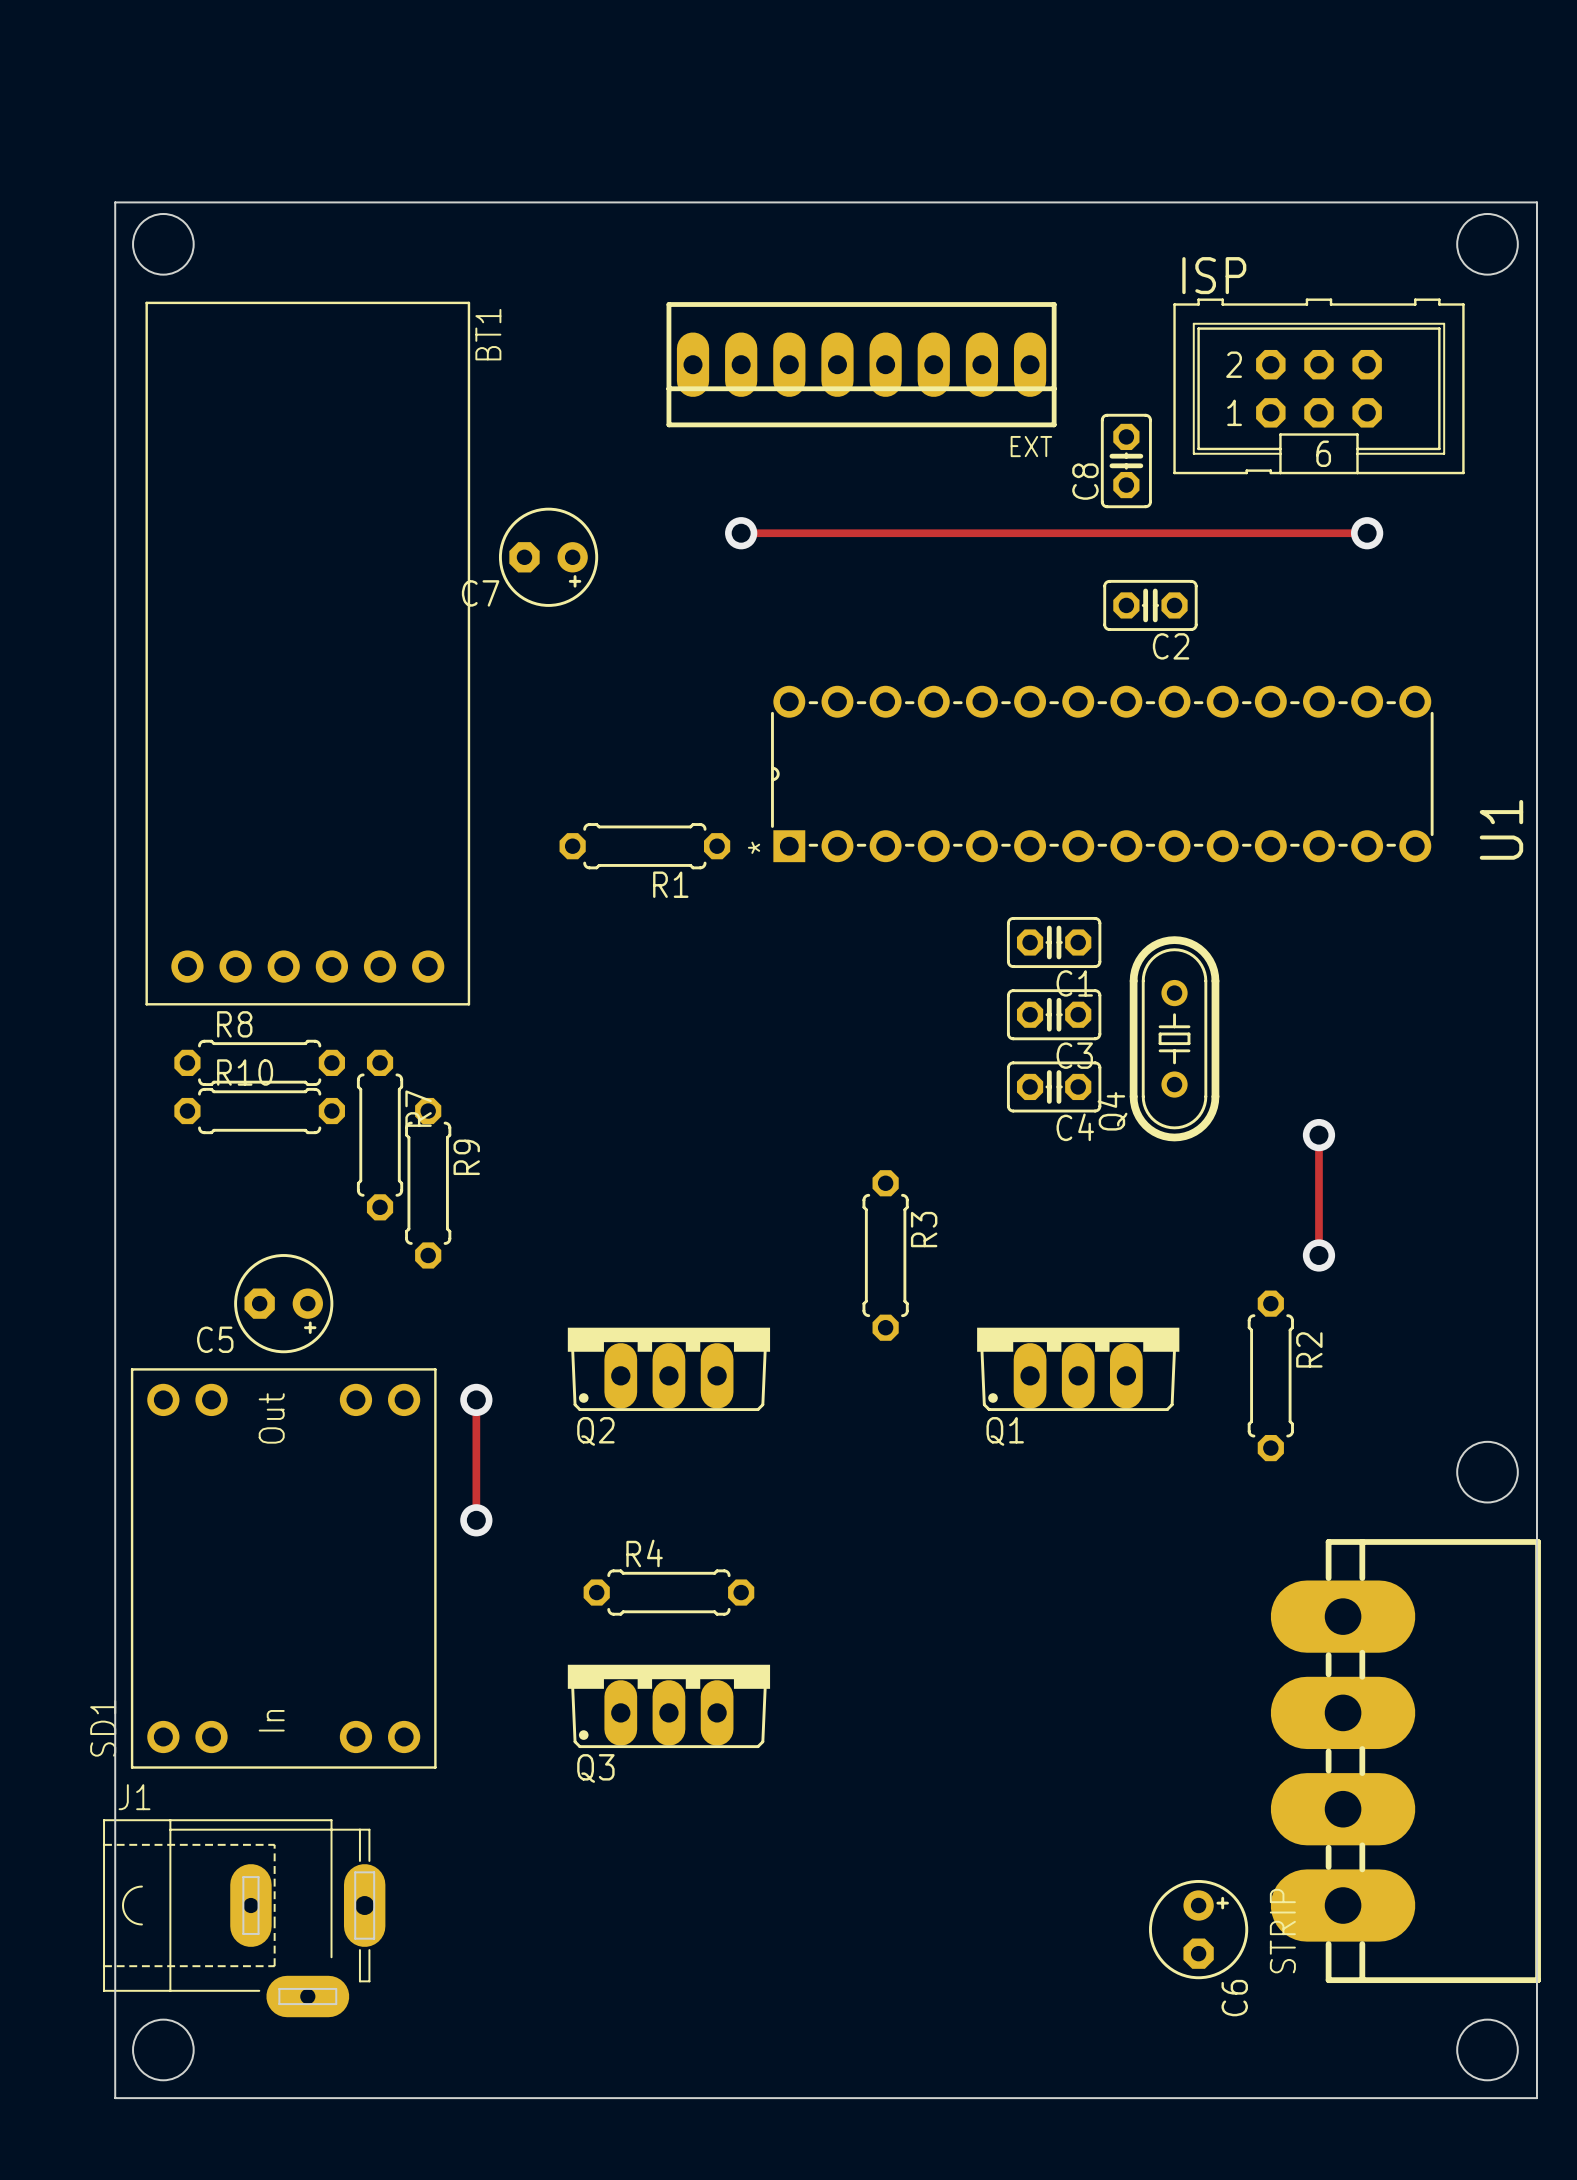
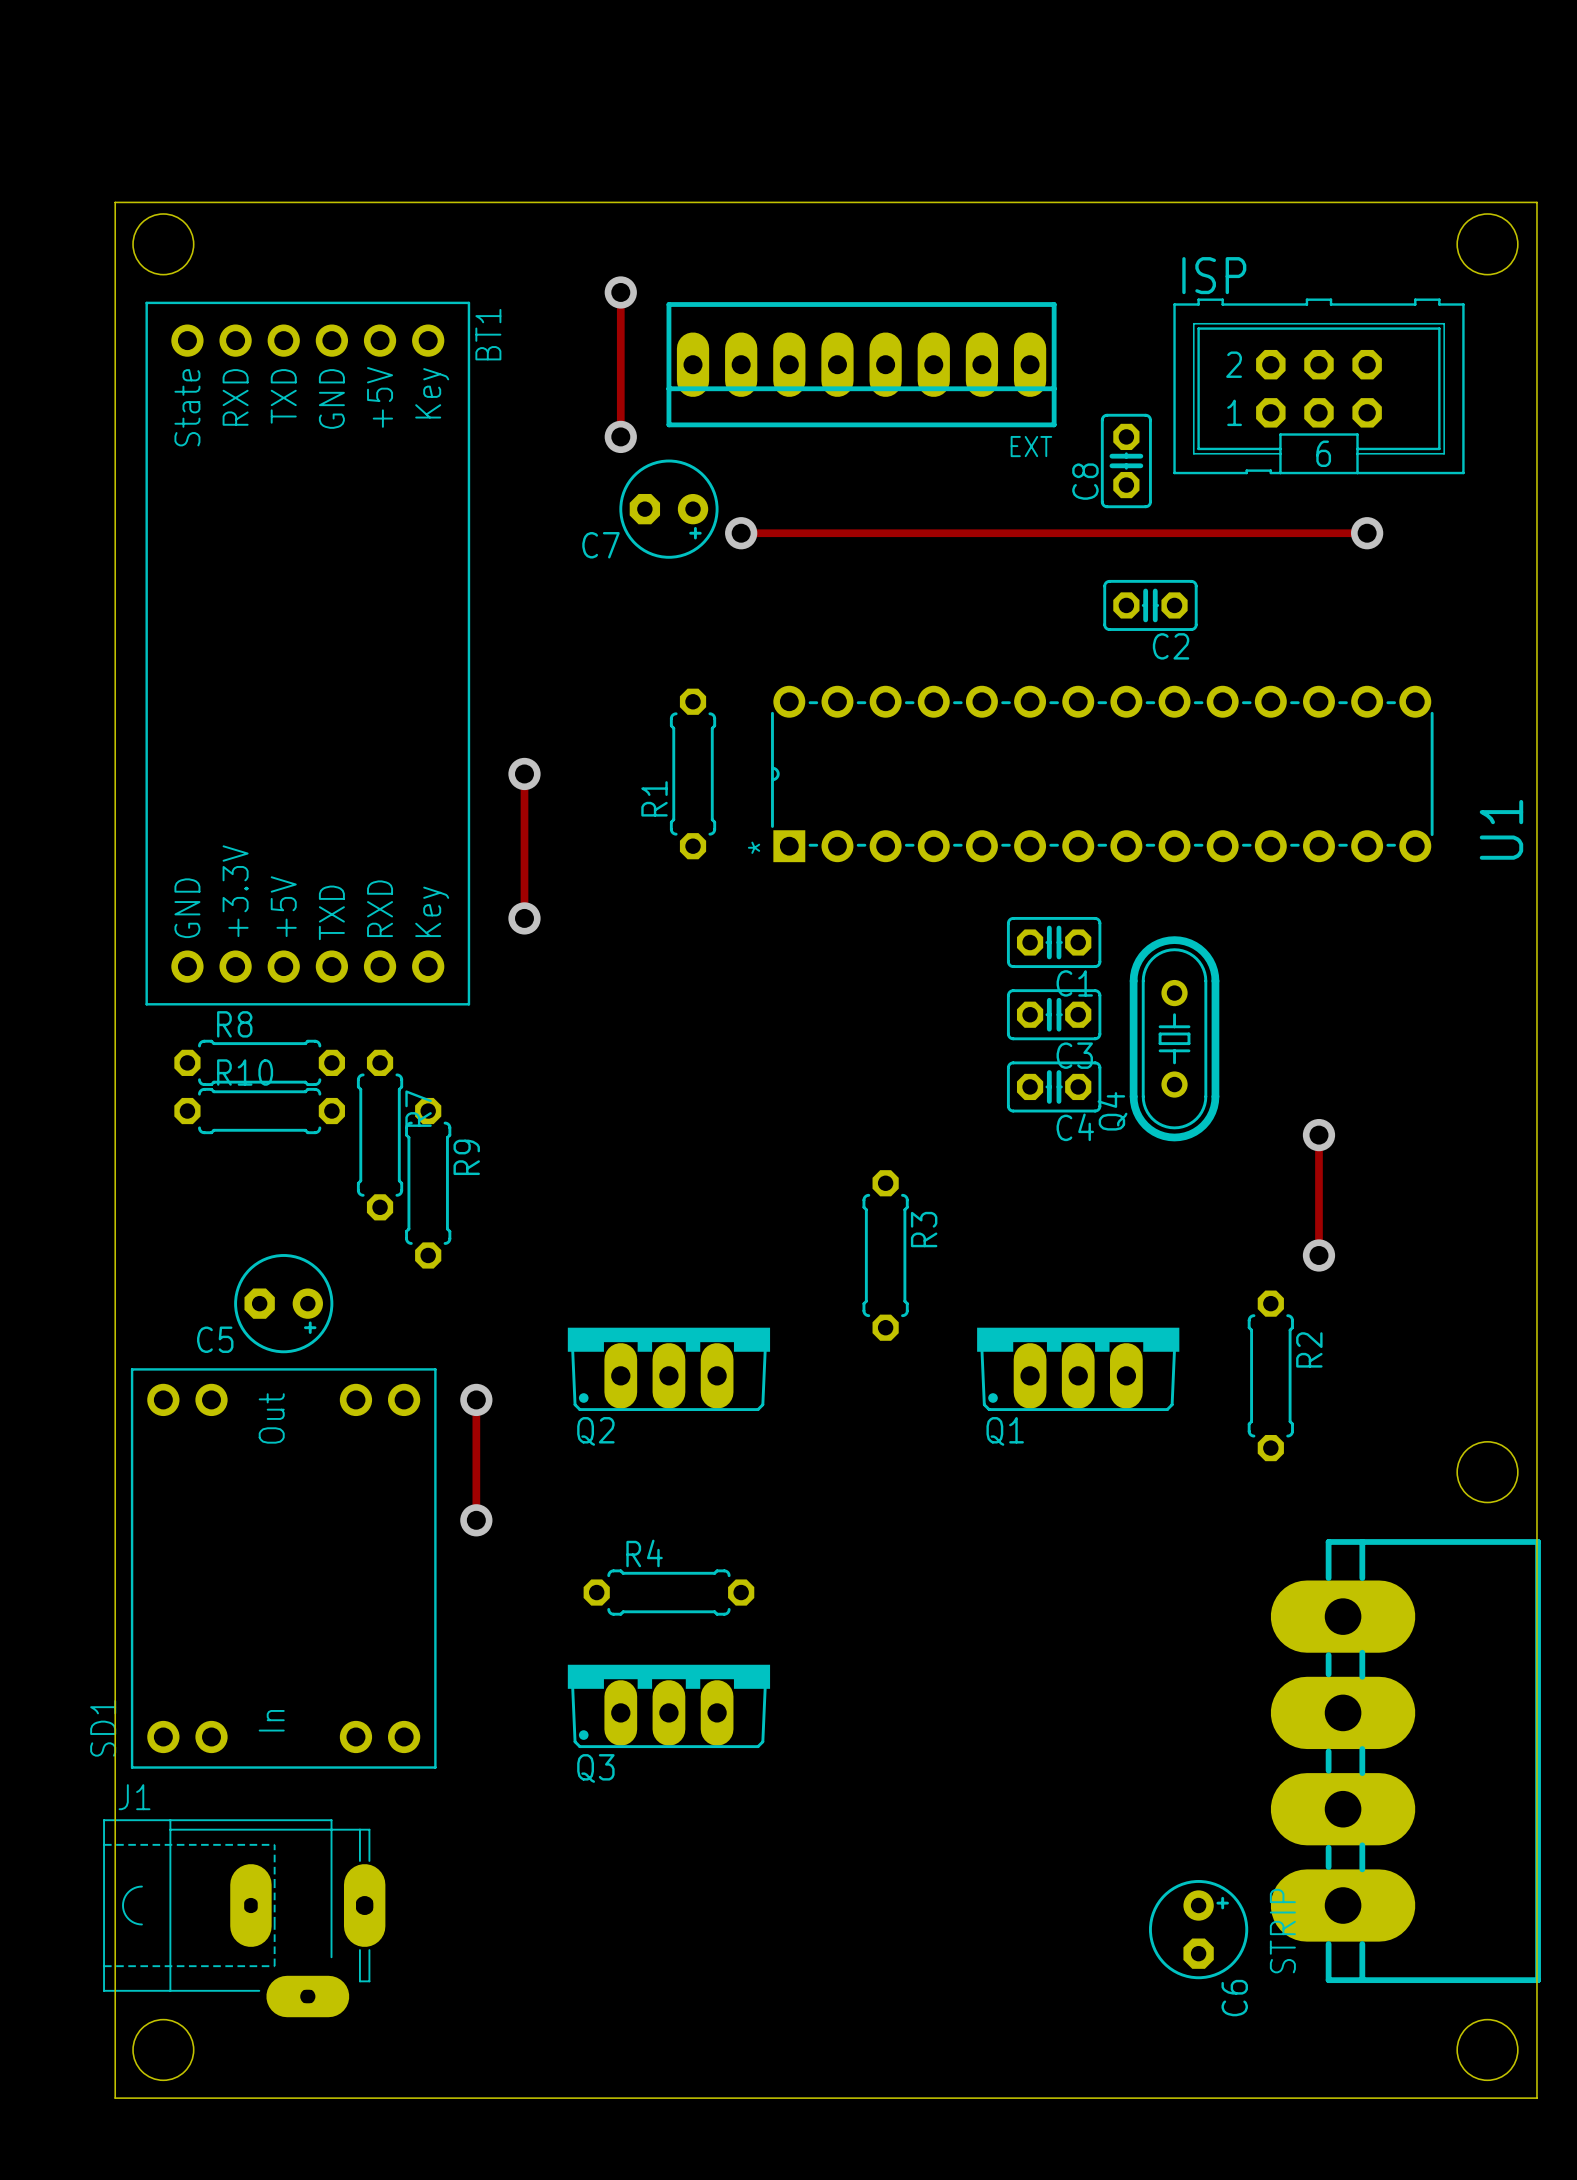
track: none -> (620, 292) (620, 436)
via: none -> (620, 292)
BT1 footprint: [145, 301, 471, 1006] -> [145, 301, 471, 1006]
via: none -> (620, 436)
C7 position: (548, 557) -> (668, 509)
track: none -> (524, 773) (524, 918)
via: none -> (524, 773)
R1 rotation: 0° (644, 846) -> 90° clockwise (693, 773)
via: none -> (524, 918)

